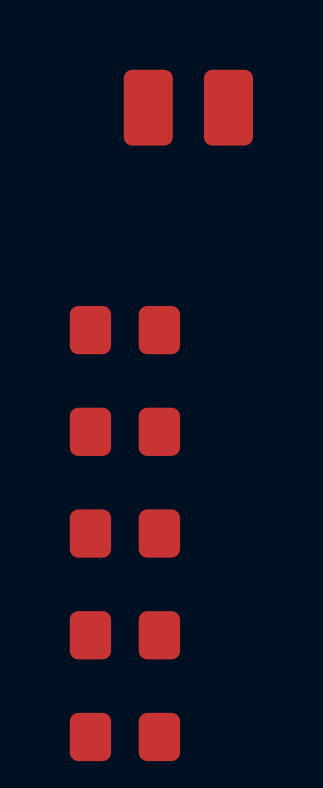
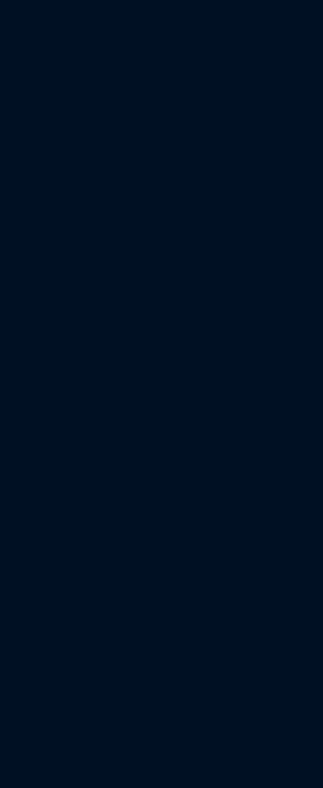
part: (188, 107) -> none
part: (124, 330) -> none
part: (124, 431) -> none
part: (124, 533) -> none
part: (124, 635) -> none
part: (124, 736) -> none

